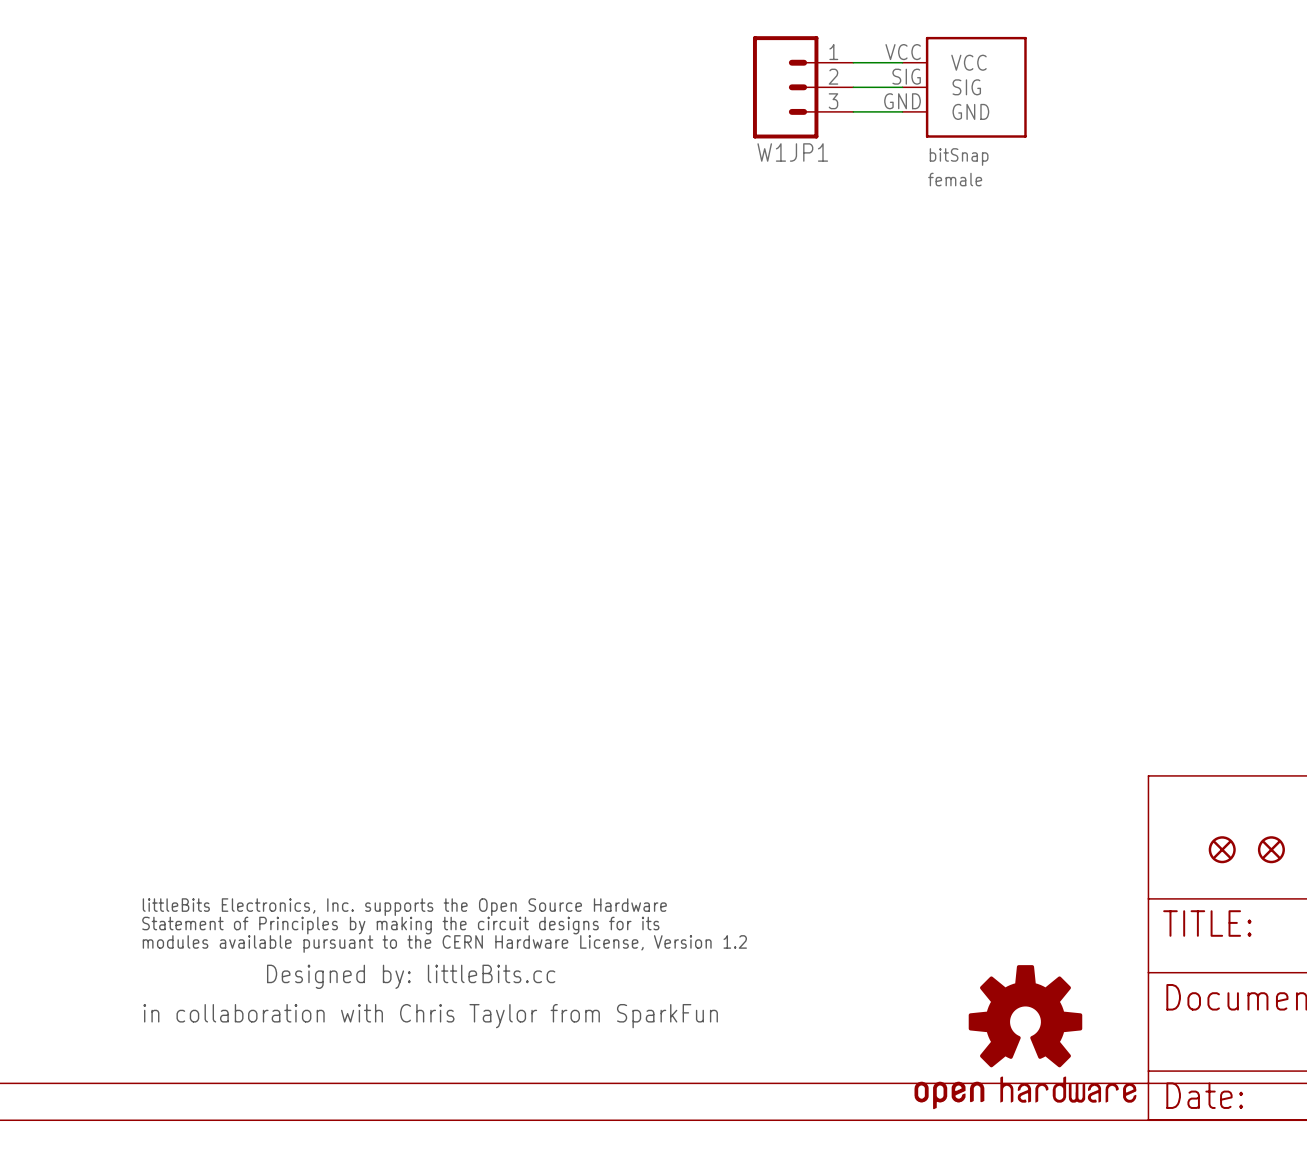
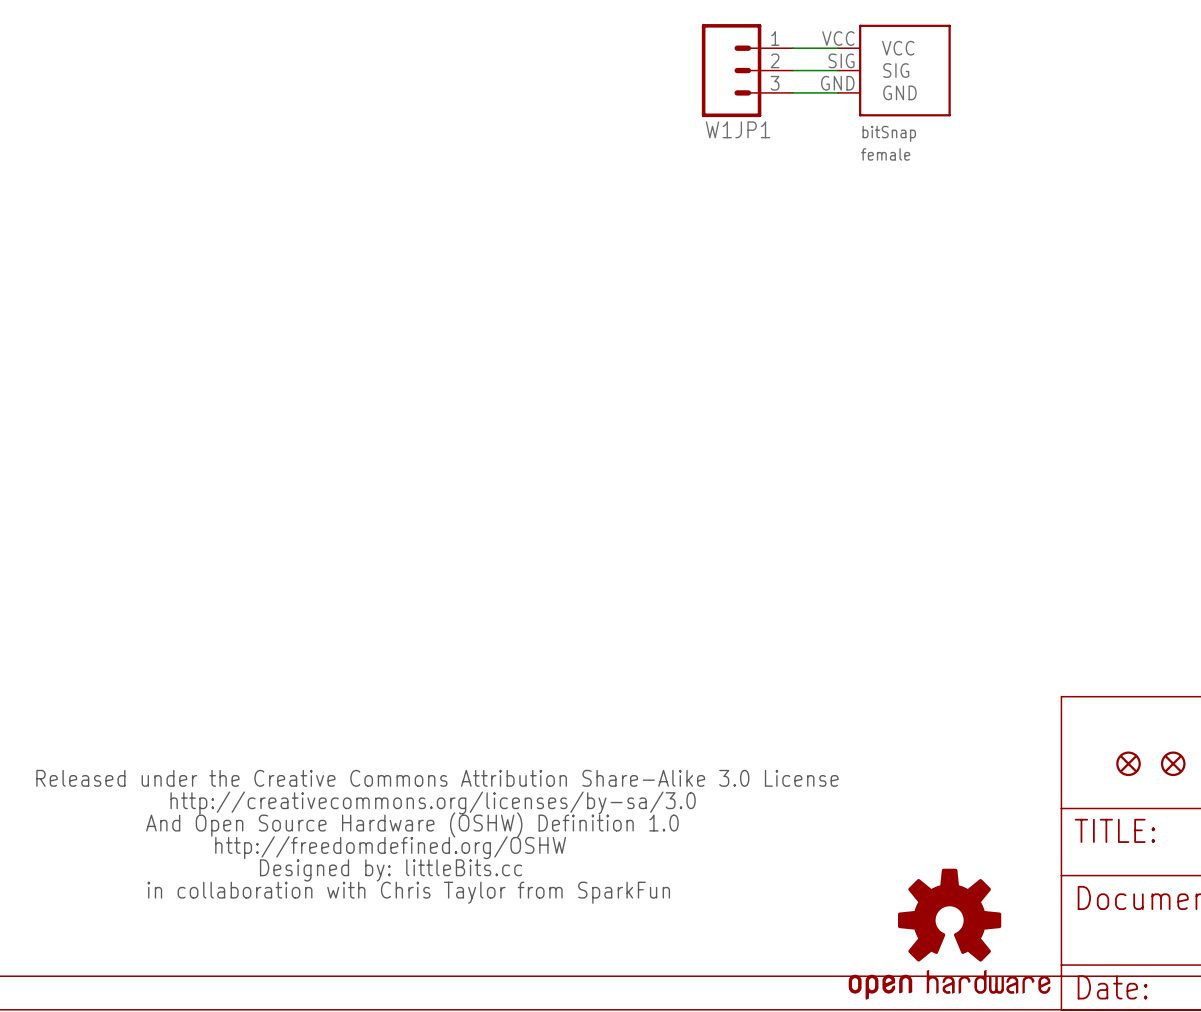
part: none -> (437, 836)
part: (444, 943) -> none
text: in collaboration with Chris Taylor from SparkFun (430, 1016) -> none

